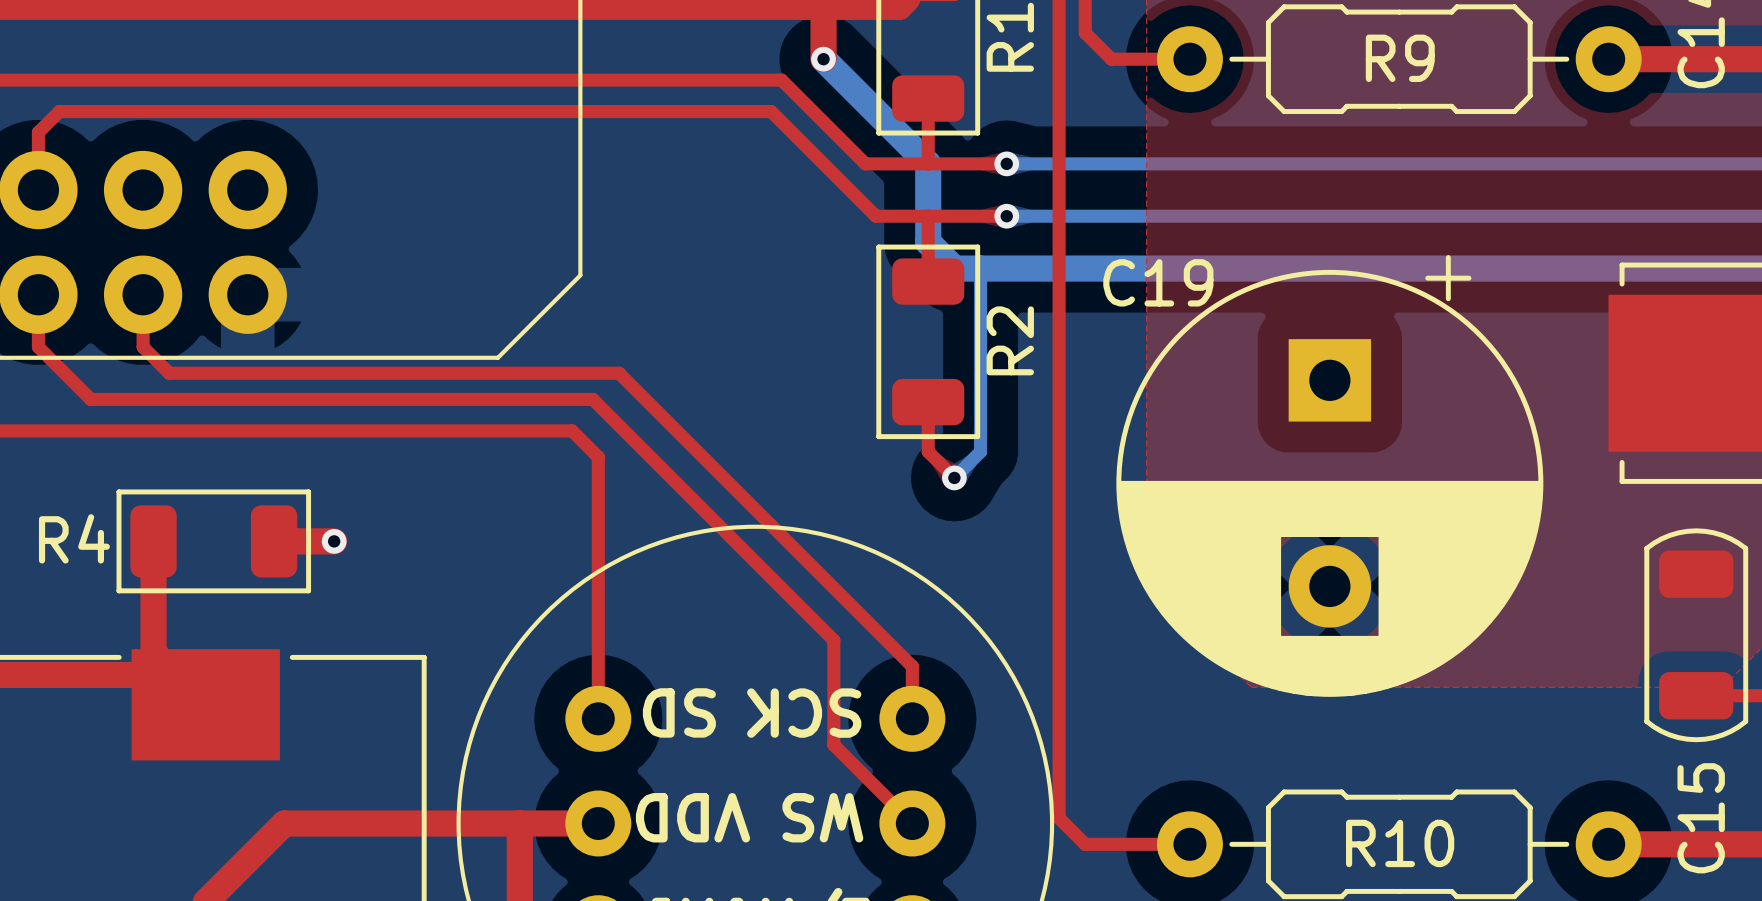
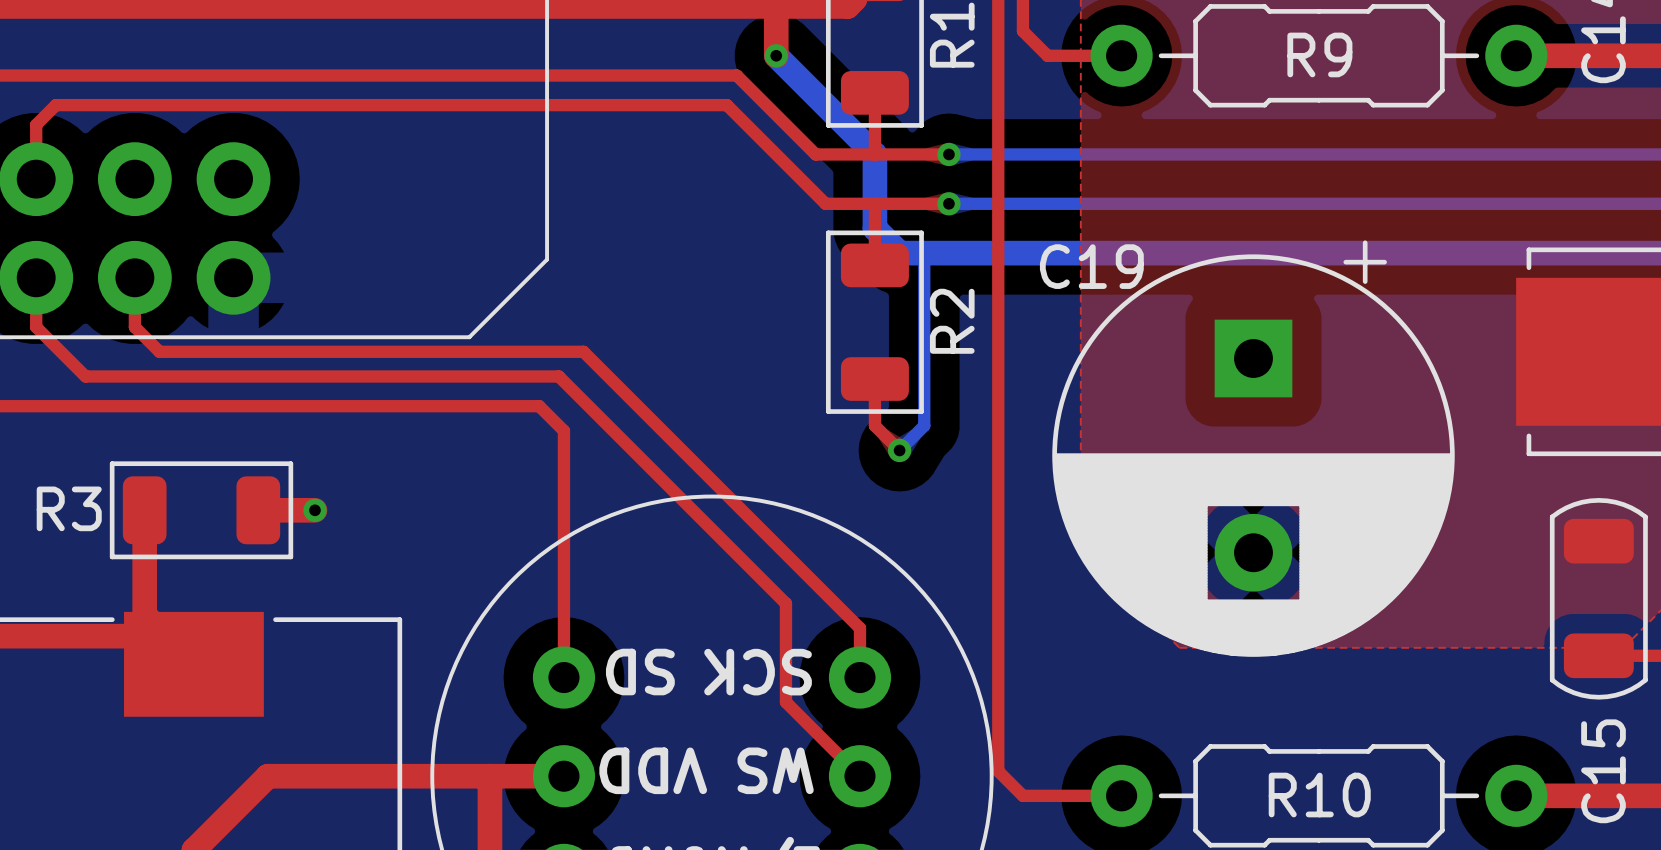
R4 name: R4 (74, 538) -> R3 (69, 508)

